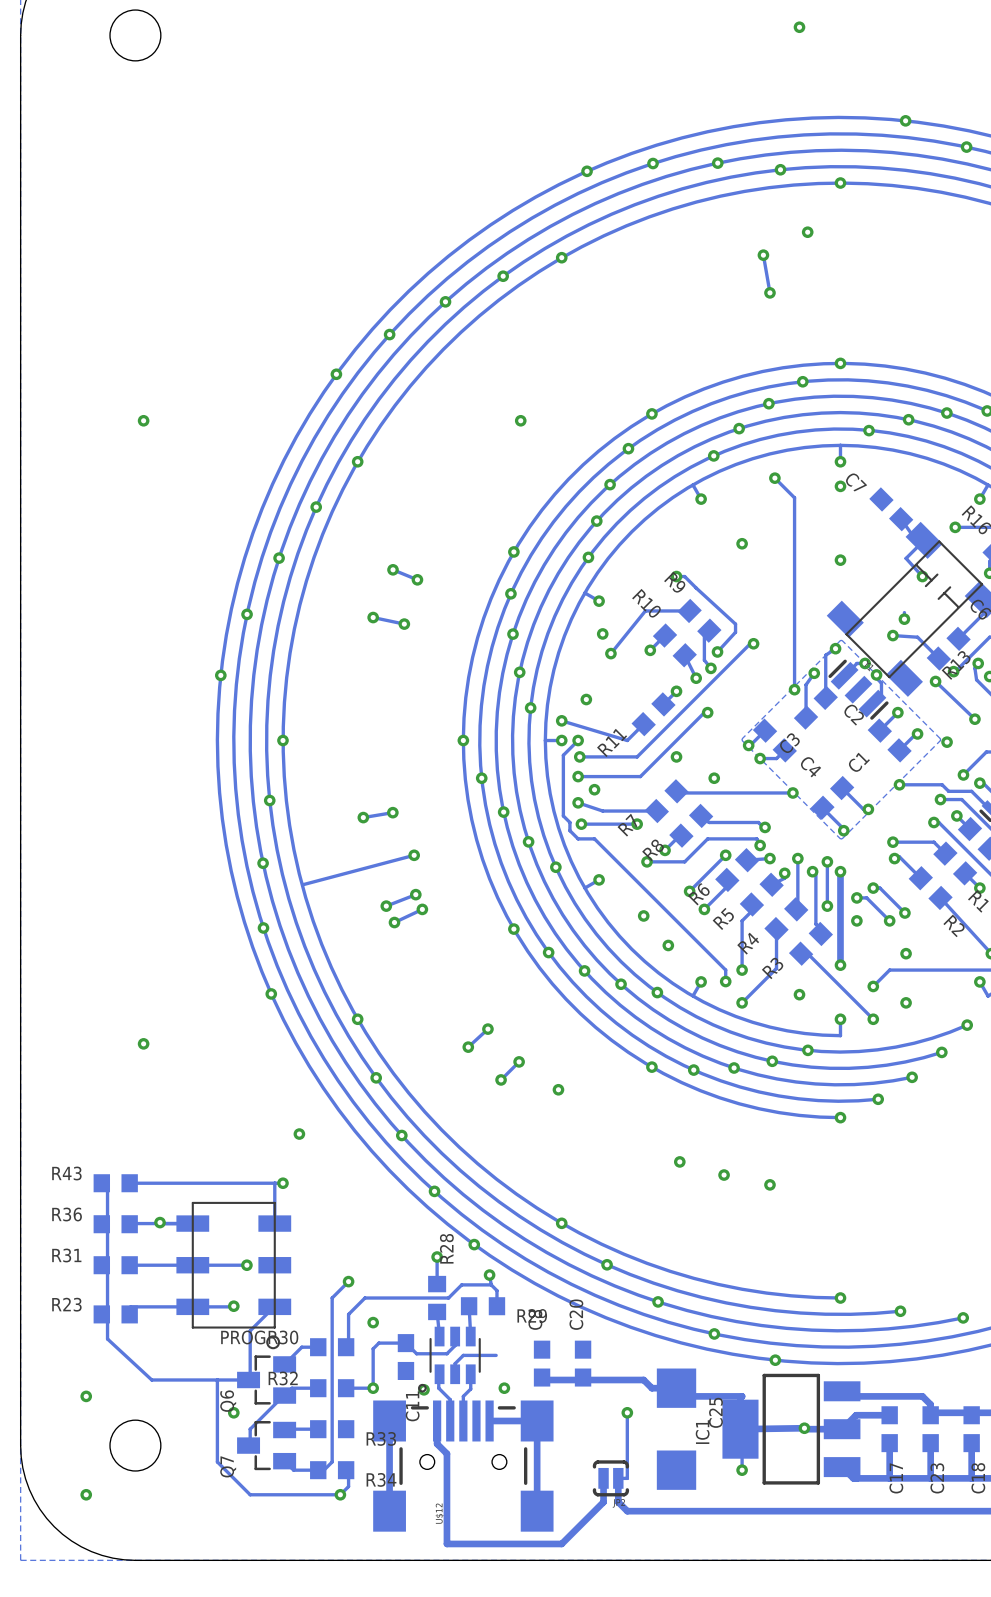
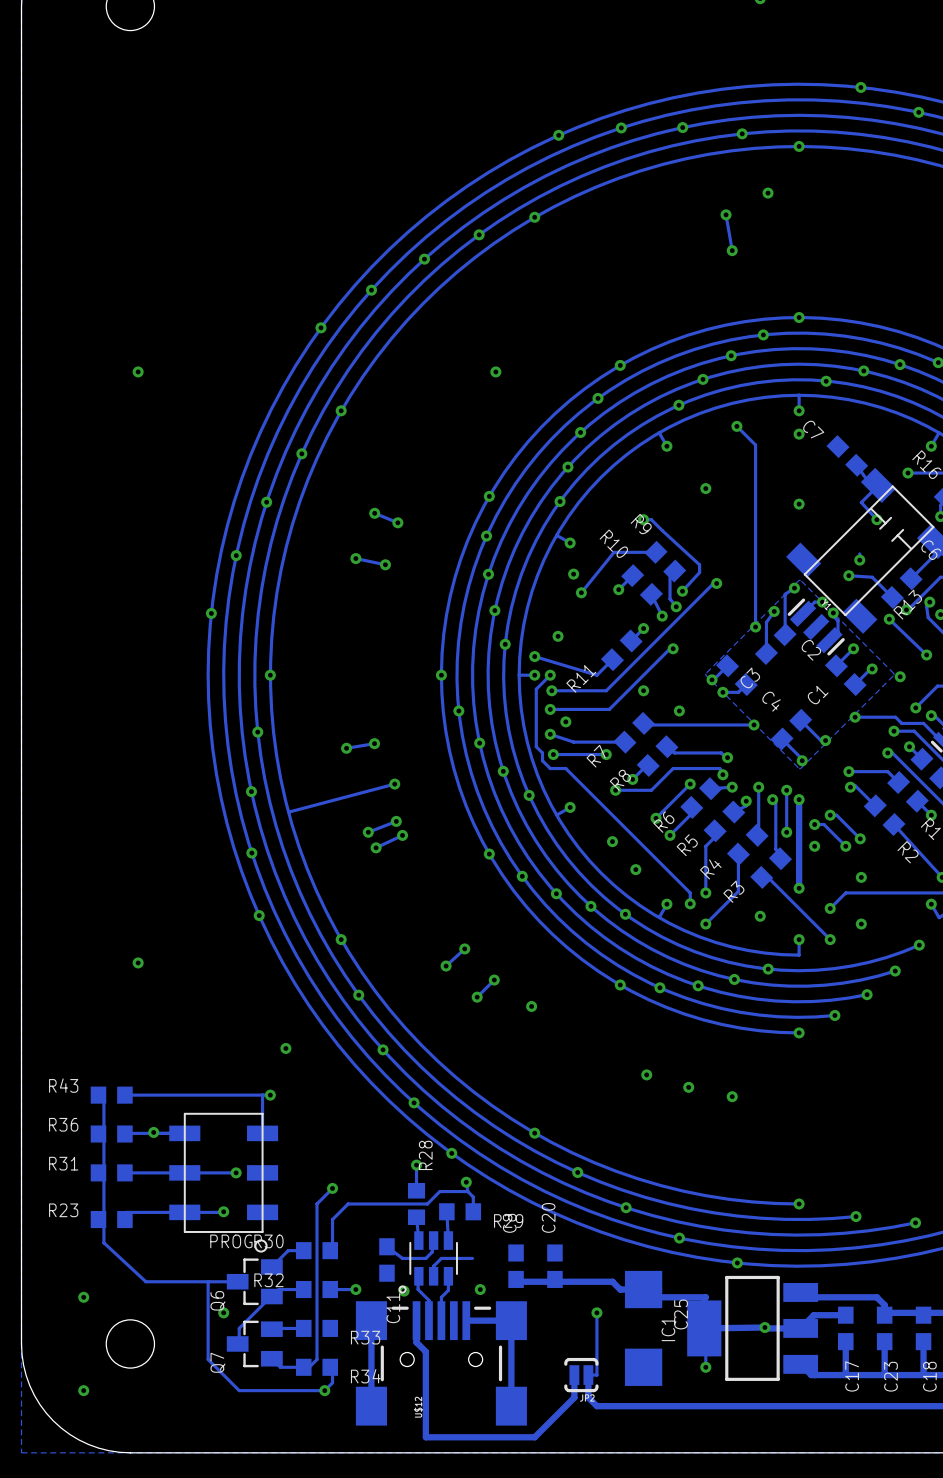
track: (274, 1306) (250, 1330) (250, 1378) (248, 1379) -> none
via: (373, 1322) -> none
track: (455, 1336) (455, 1345) (446, 1353) (416, 1353) (405, 1343) (378, 1343) (373, 1348) (373, 1388) -> (433, 1240) (432, 1252) (425, 1258) (402, 1258) (386, 1246)

